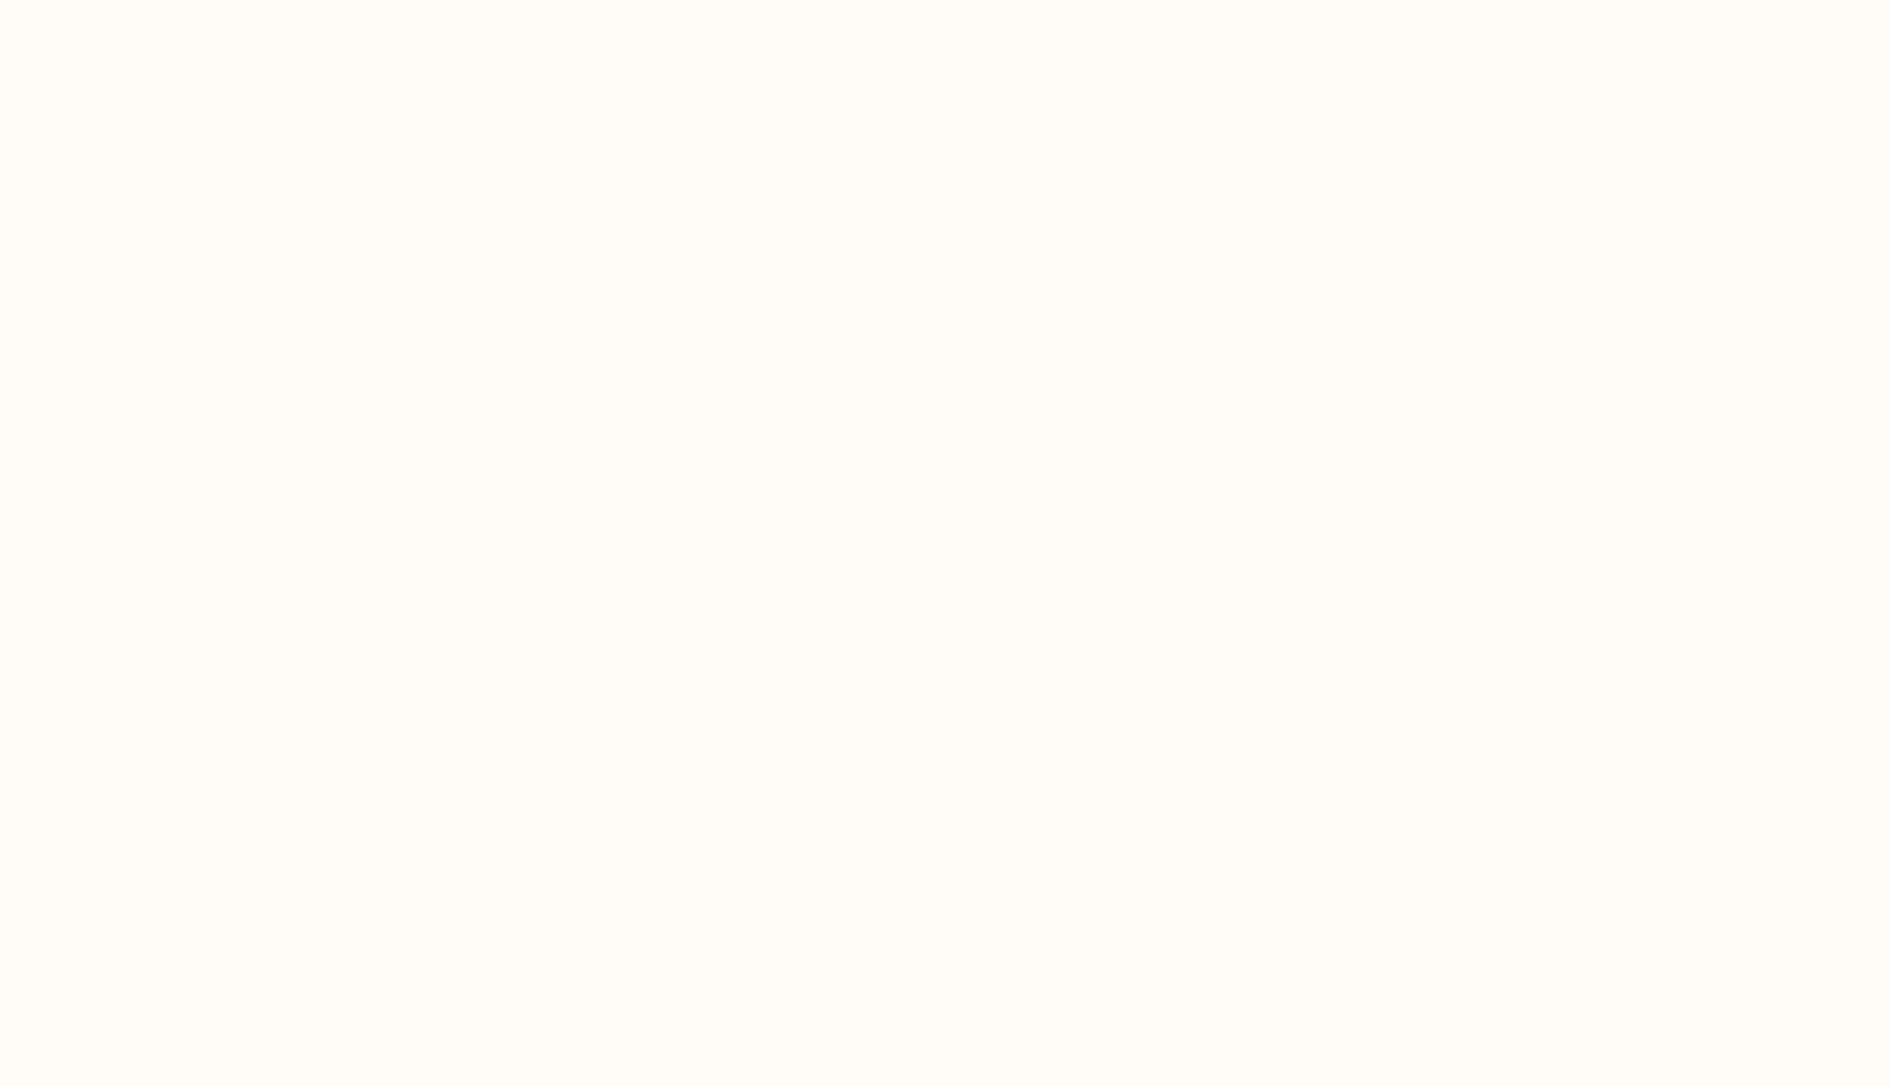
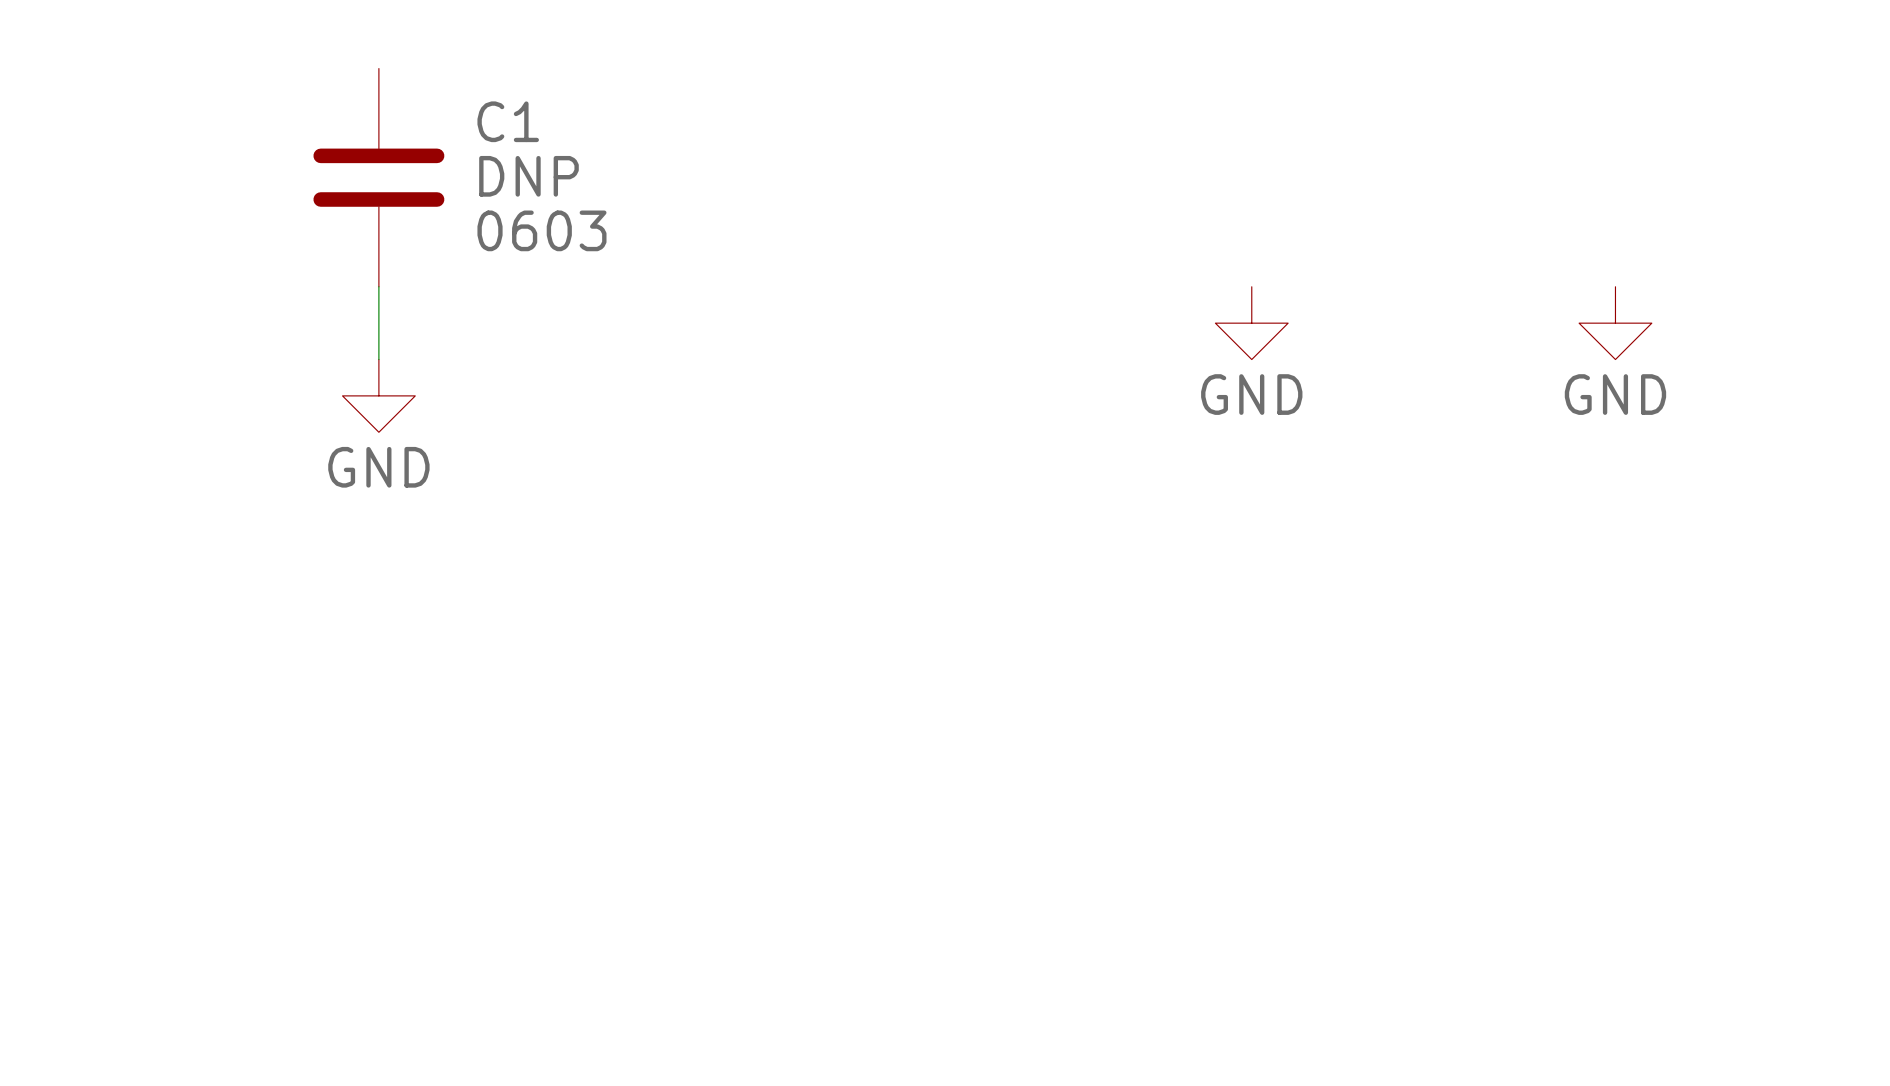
C1: none -> DNP (378, 177)
wire: none -> (378, 286) (378, 359)
power symbol: none -> GND (1251, 323)
power symbol: none -> GND (1615, 323)
power symbol: none -> GND (378, 395)

